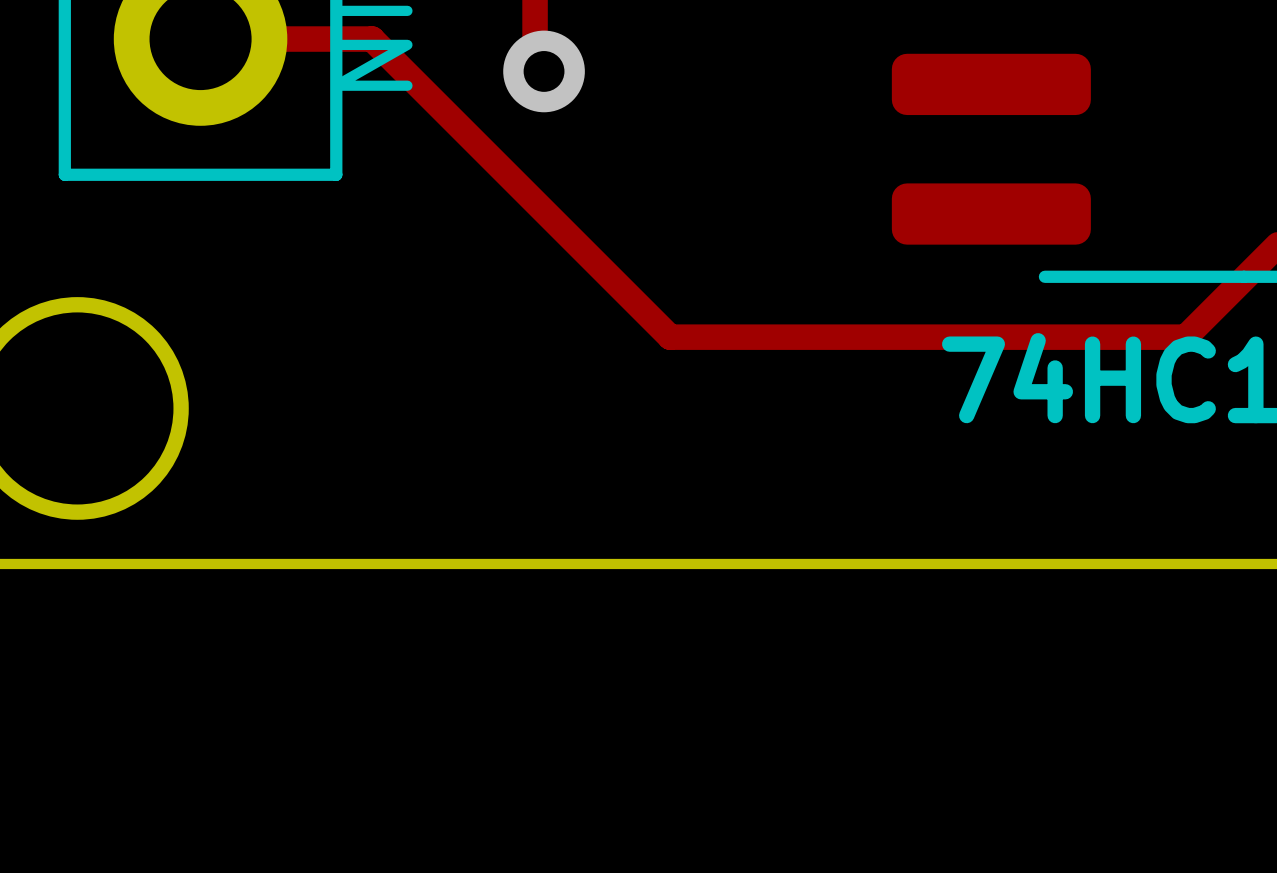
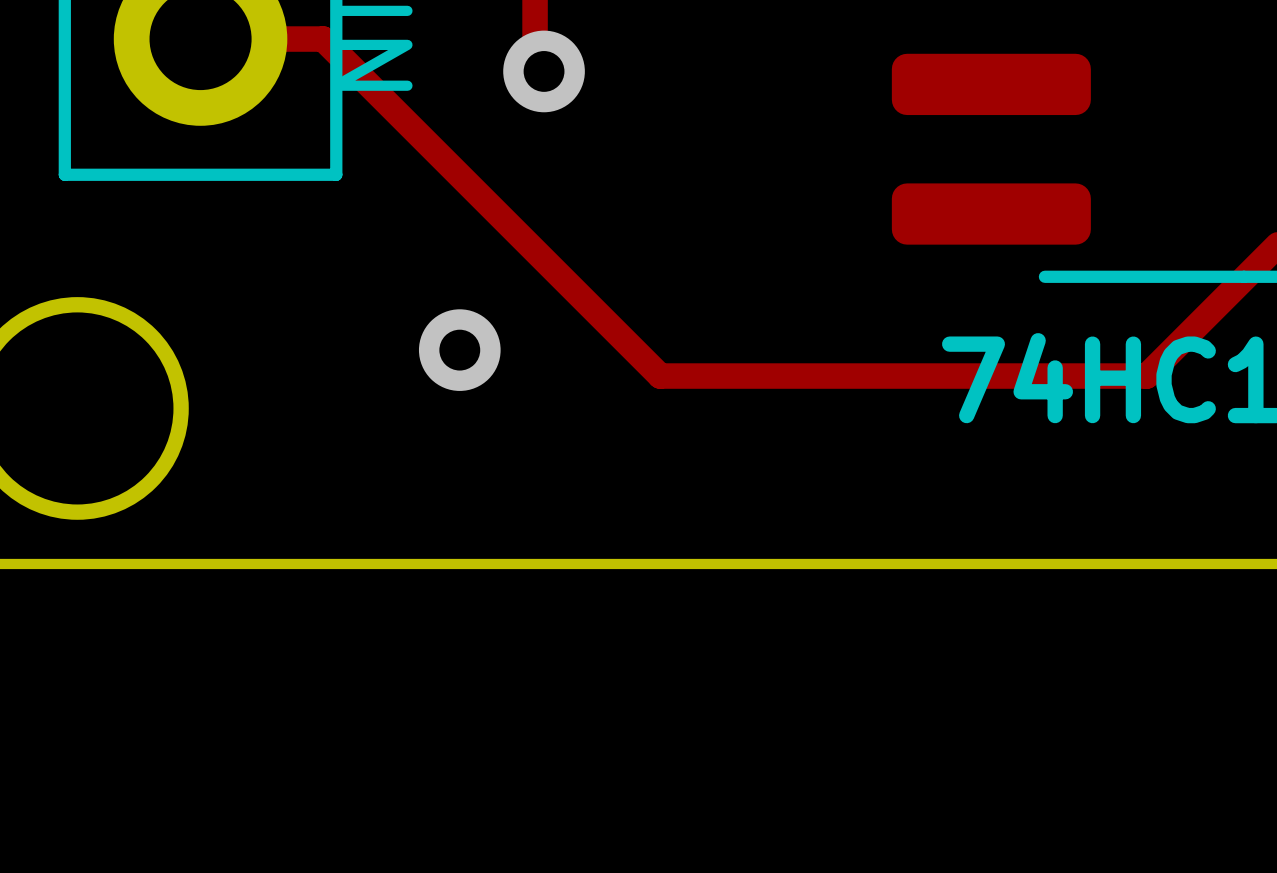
track: (323, 39) (372, 39) (670, 337) (1185, 337) -> (323, 39) (660, 376) (1146, 376) (1185, 337)
via: none -> (459, 350)

